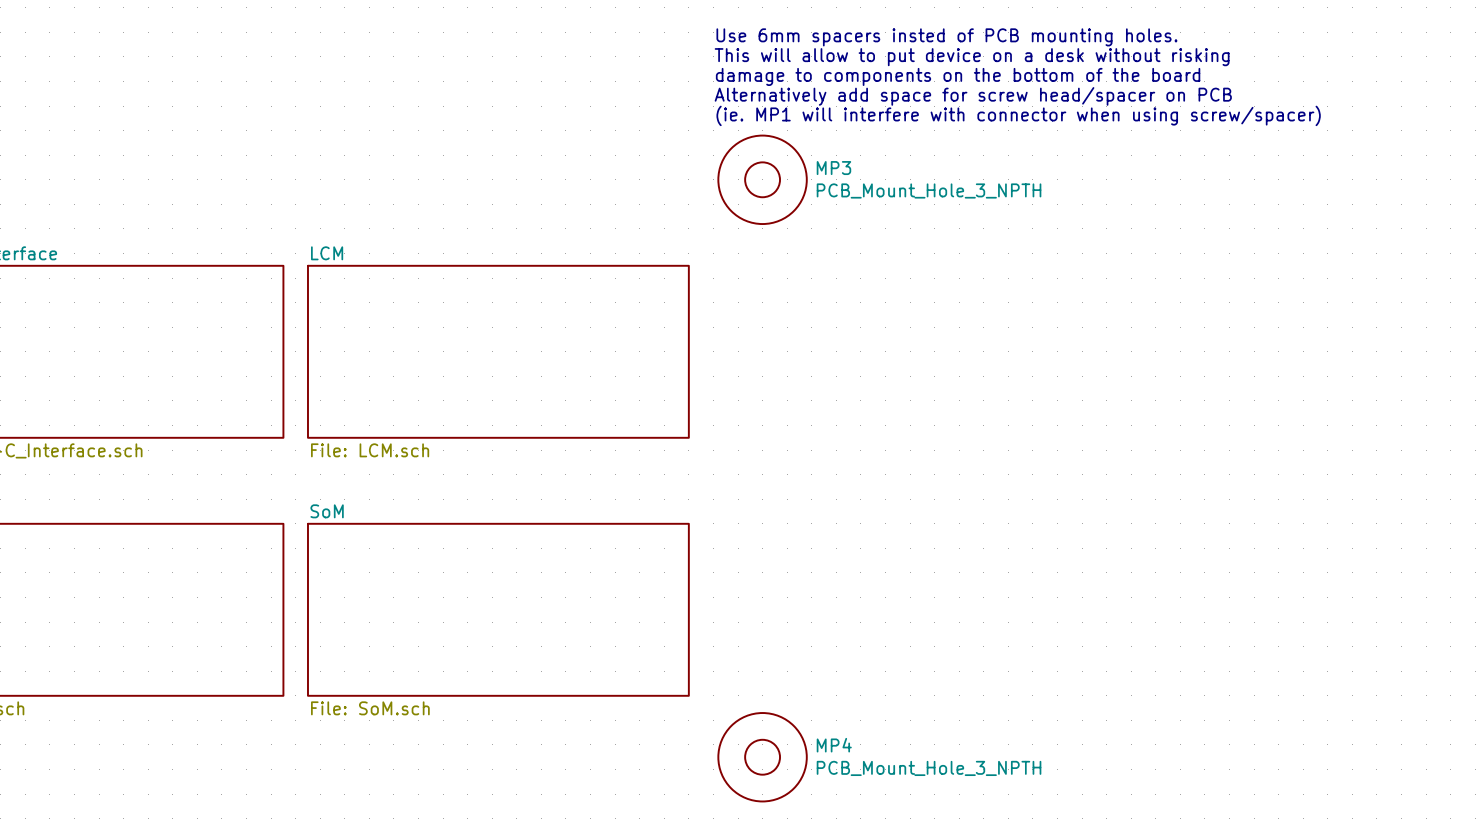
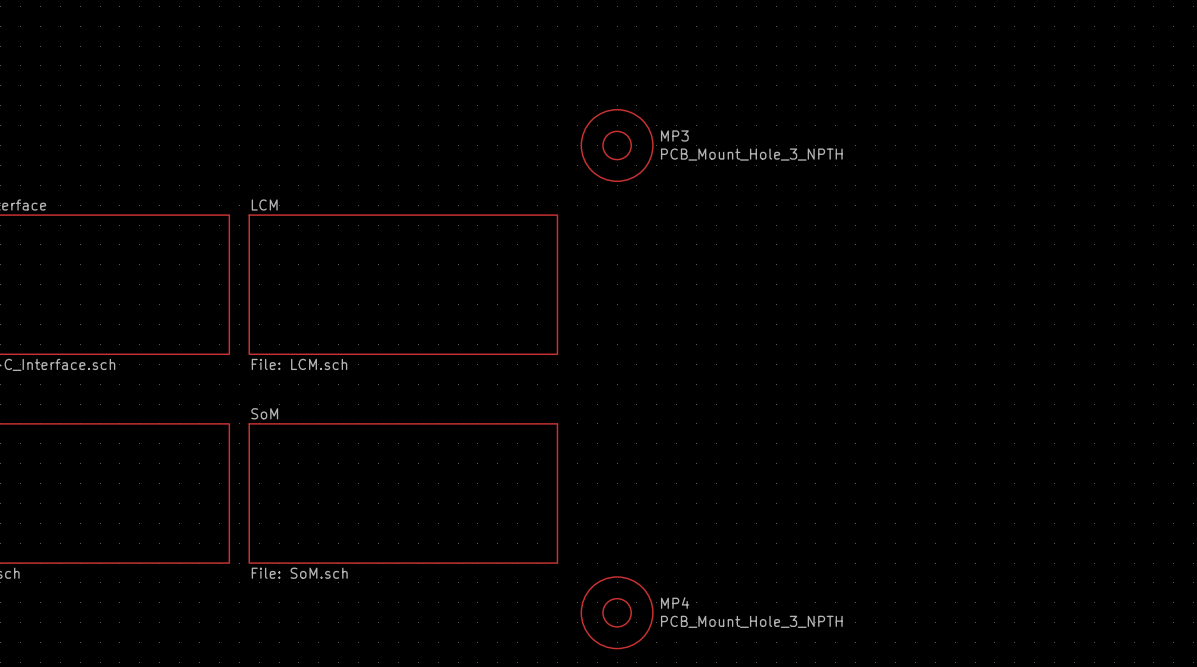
text: Use 6mm spacers insted of PCB mounting holes. (946, 37) -> none
text: This will allow to put device on a desk without risking (972, 57) -> none
text: damage to components on the bottom of the board (958, 76) -> none
text: Alternatively add space for screw head/spacer on PCB (973, 96) -> none
text: (ie. MP1 will interfere with connector when using screw/spacer) (1018, 115) -> none

